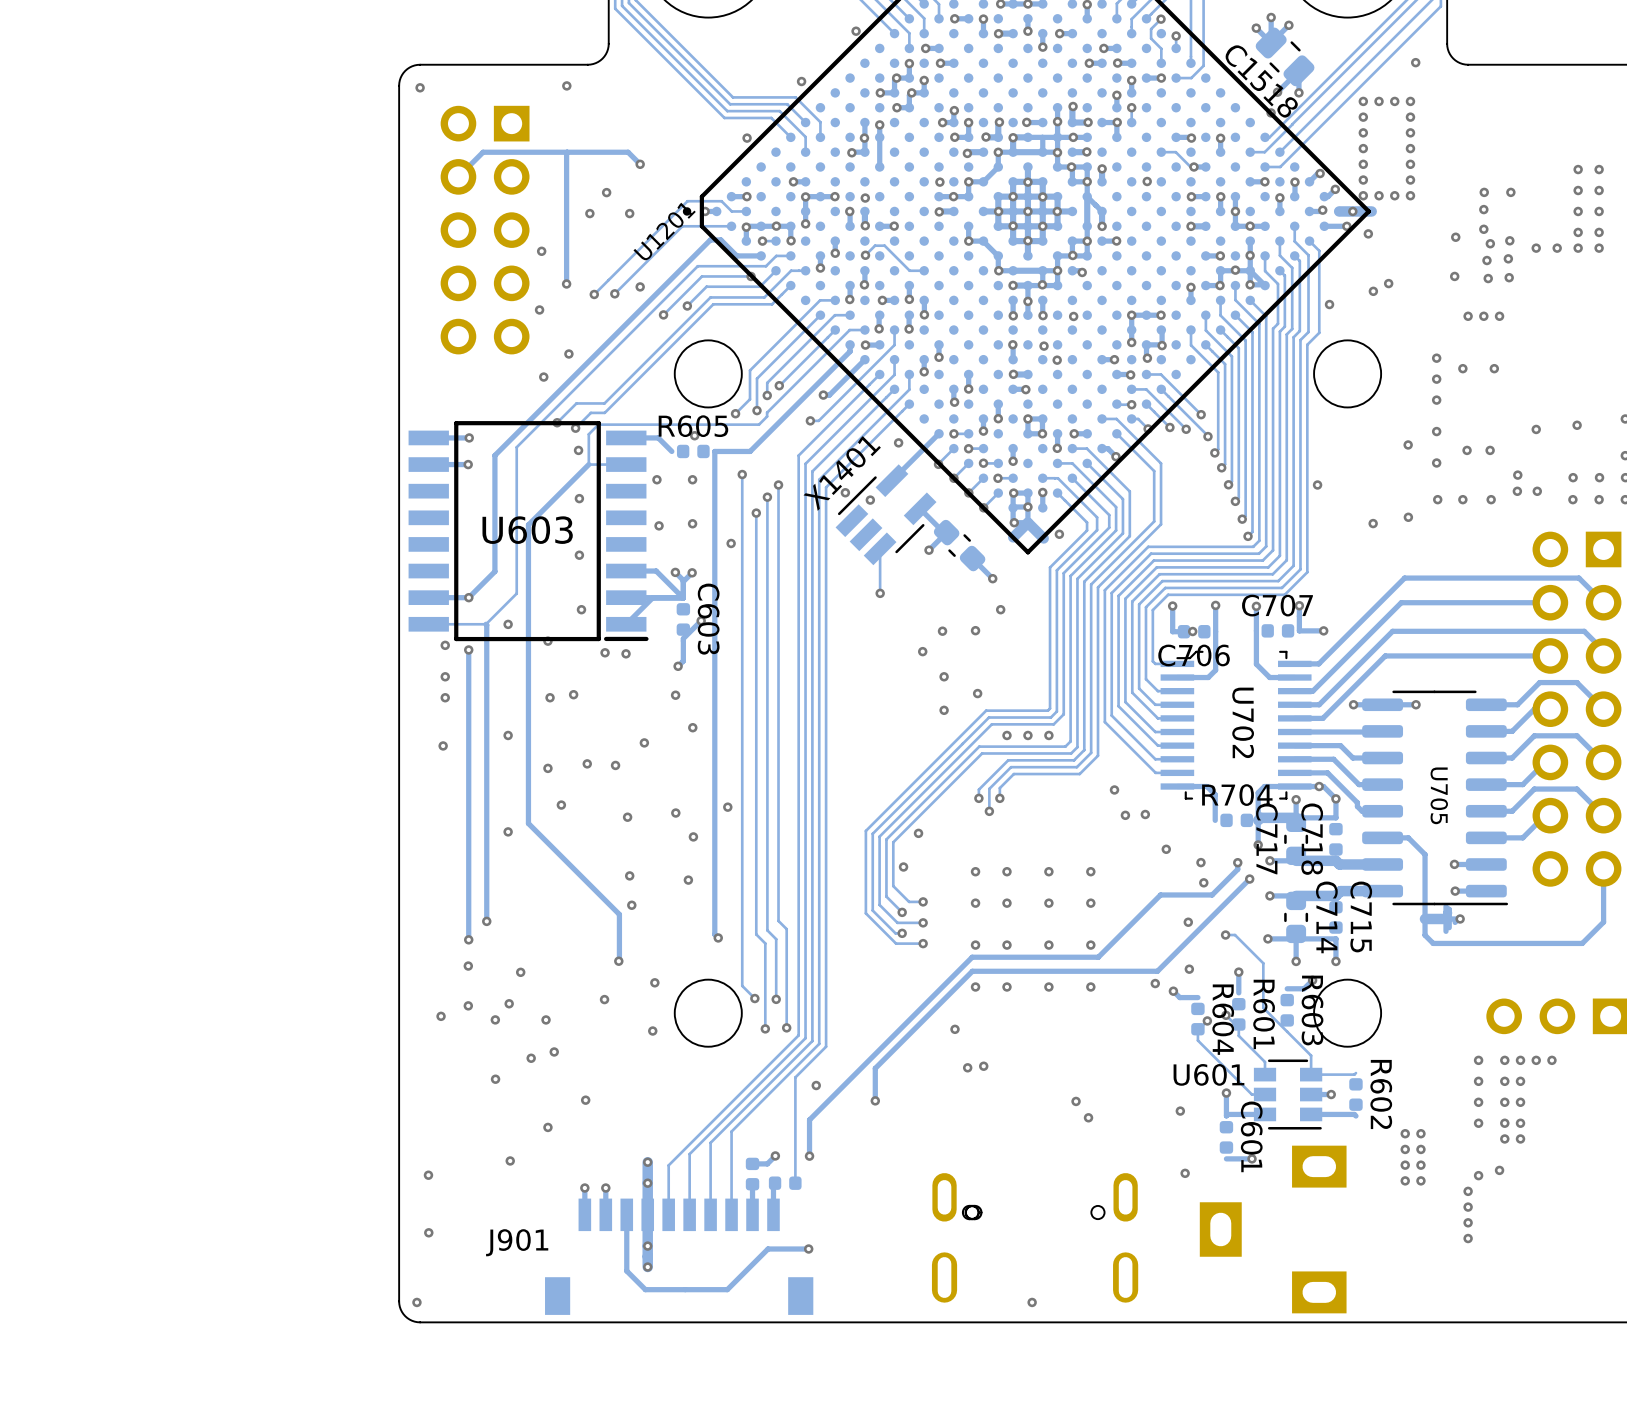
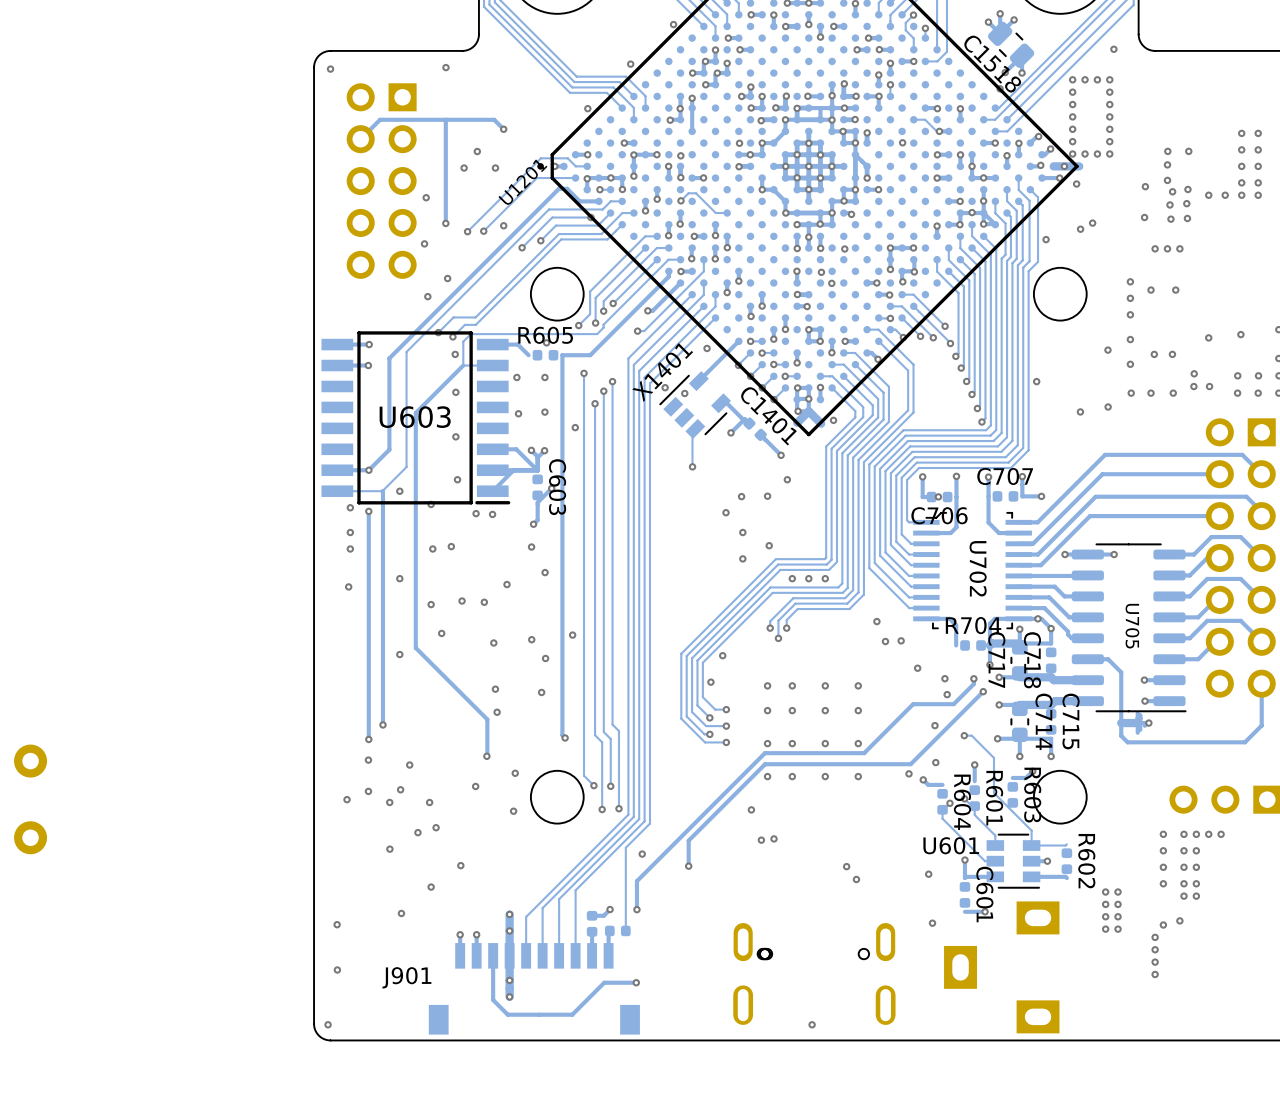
X1401 footprint: [835, 464, 937, 566] -> [659, 371, 732, 439]
part: (959, 545) -> none
C1401: none -> (755, 429)
part: none -> (30, 761)
part: none -> (30, 837)

